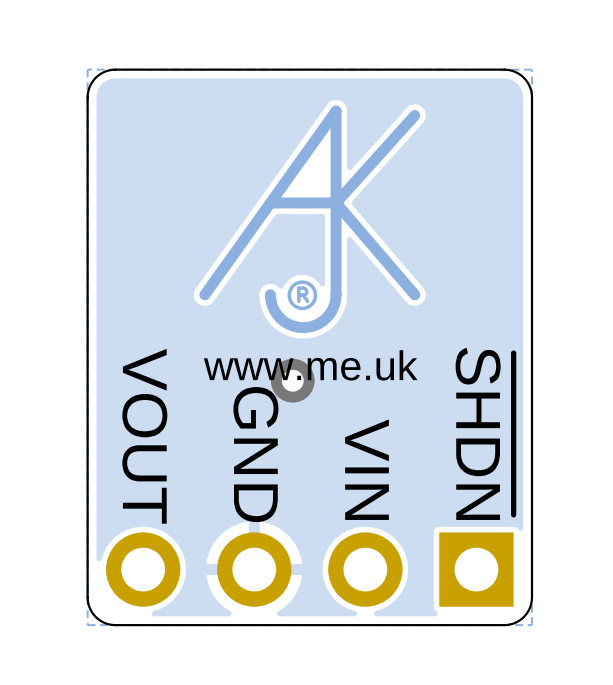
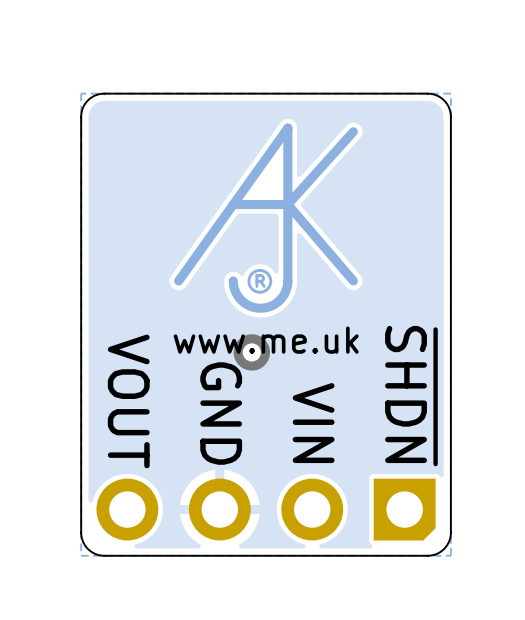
part footprint: [106, 532, 514, 607] -> [96, 478, 436, 541]

